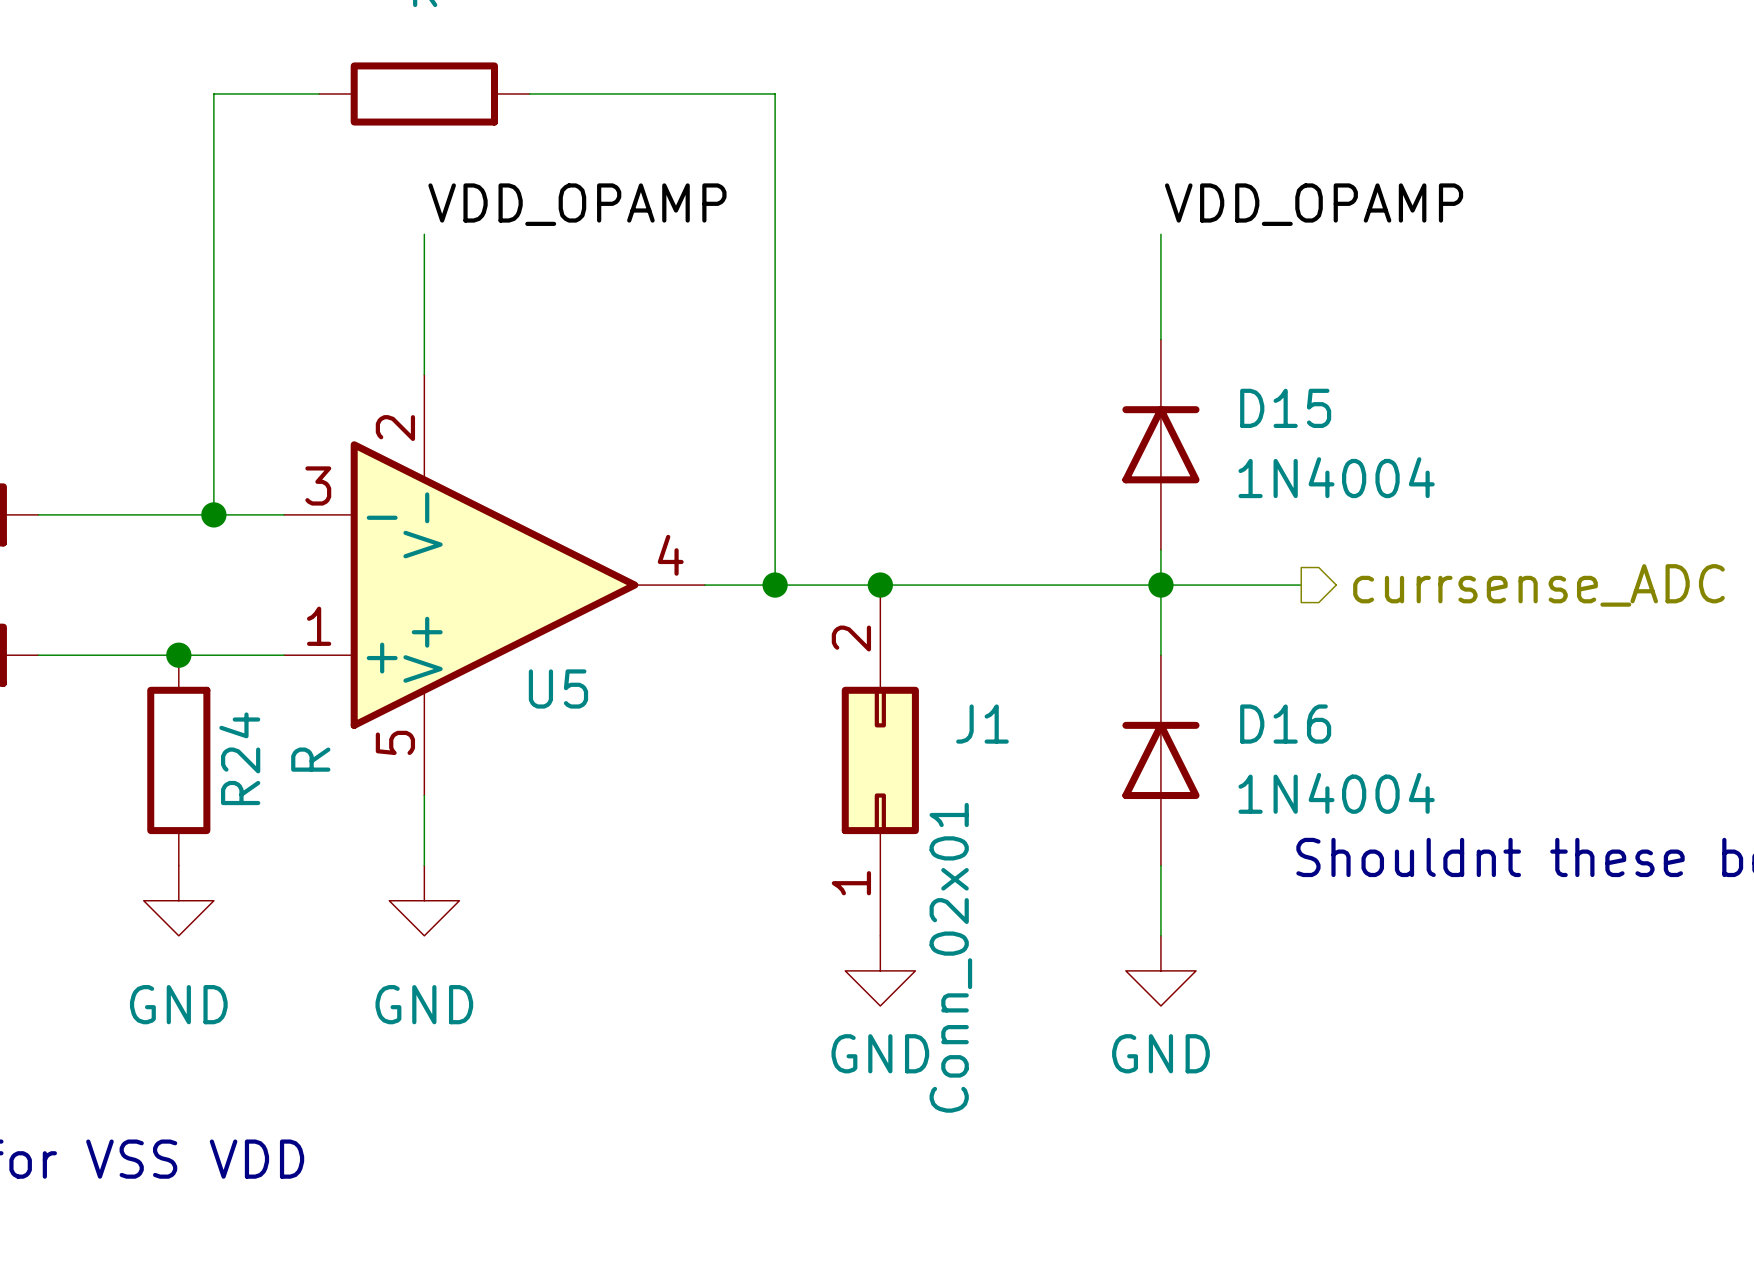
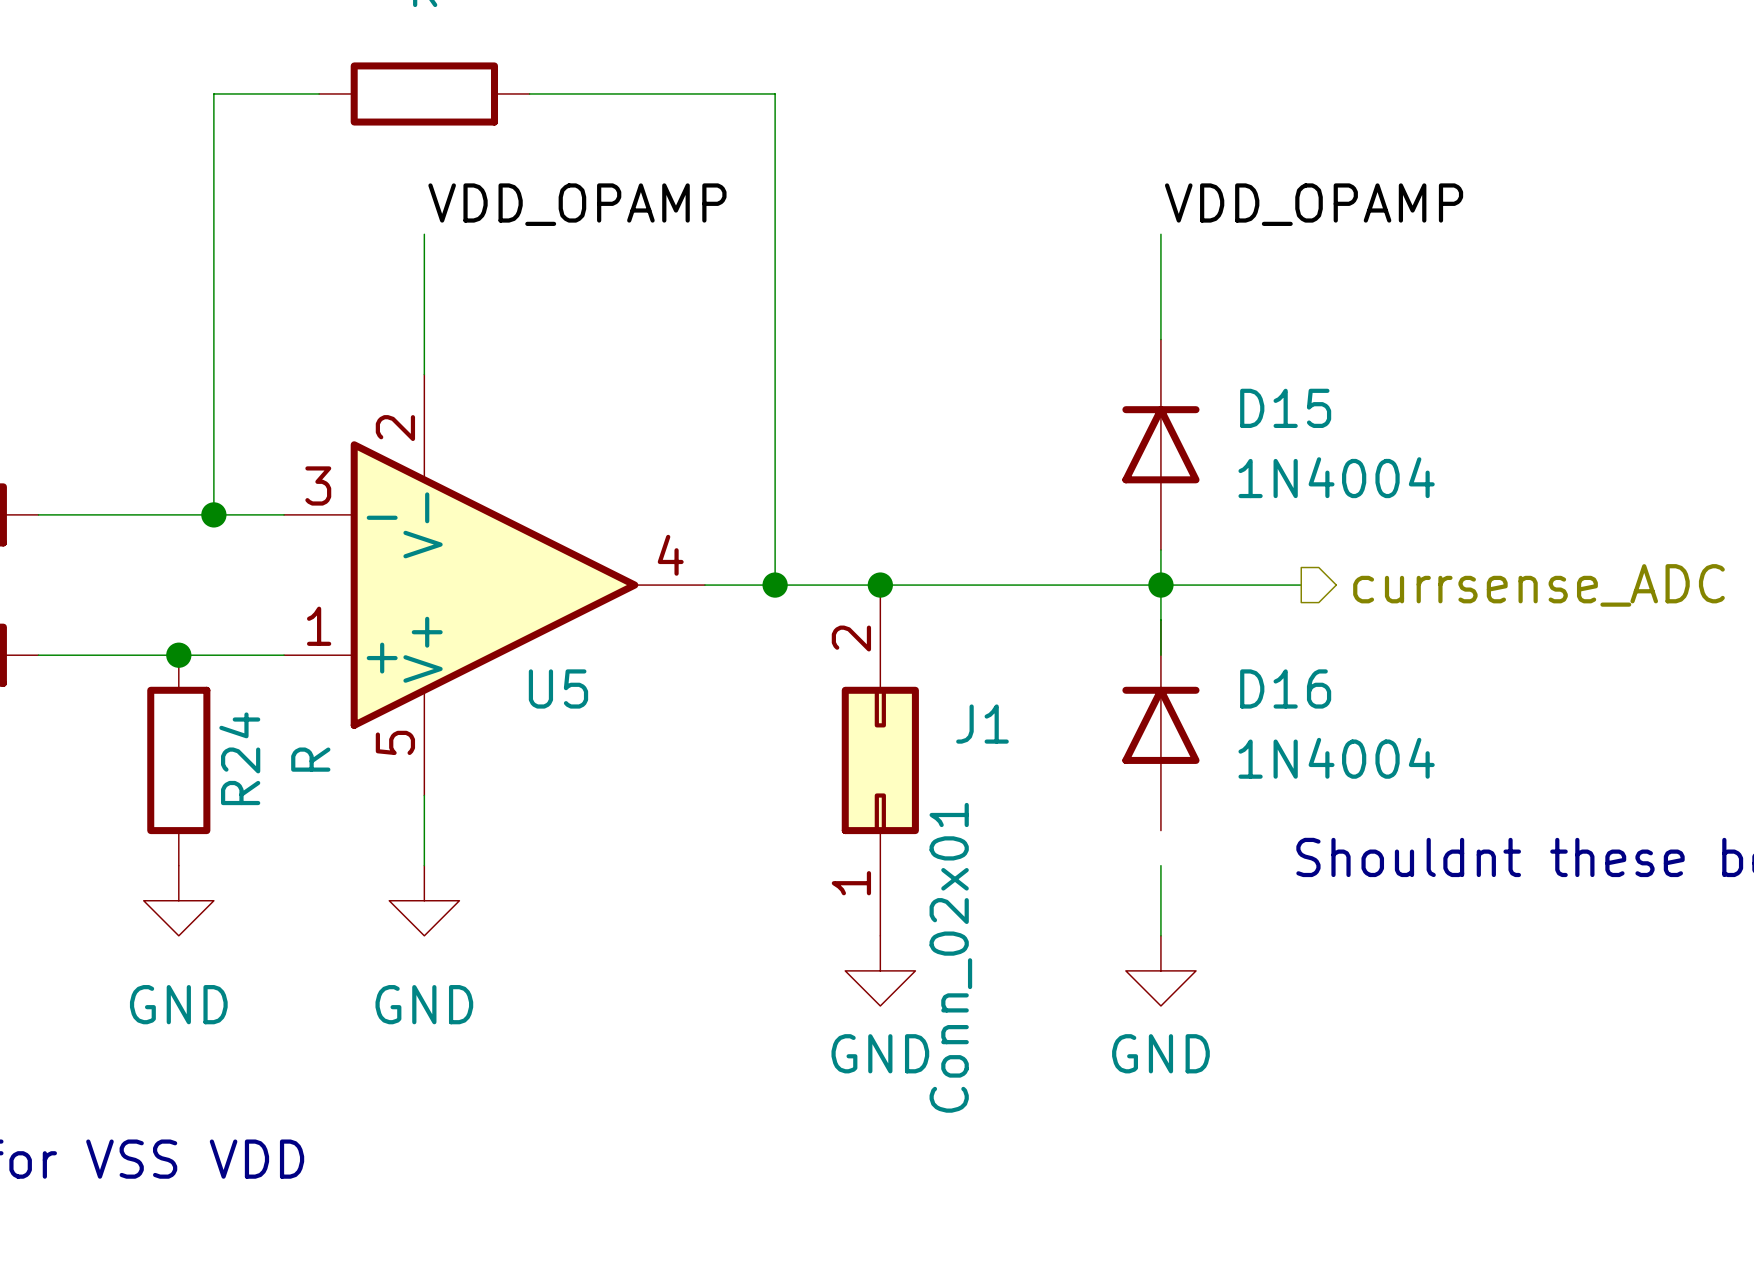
D16 position: (1160, 760) -> (1160, 725)

